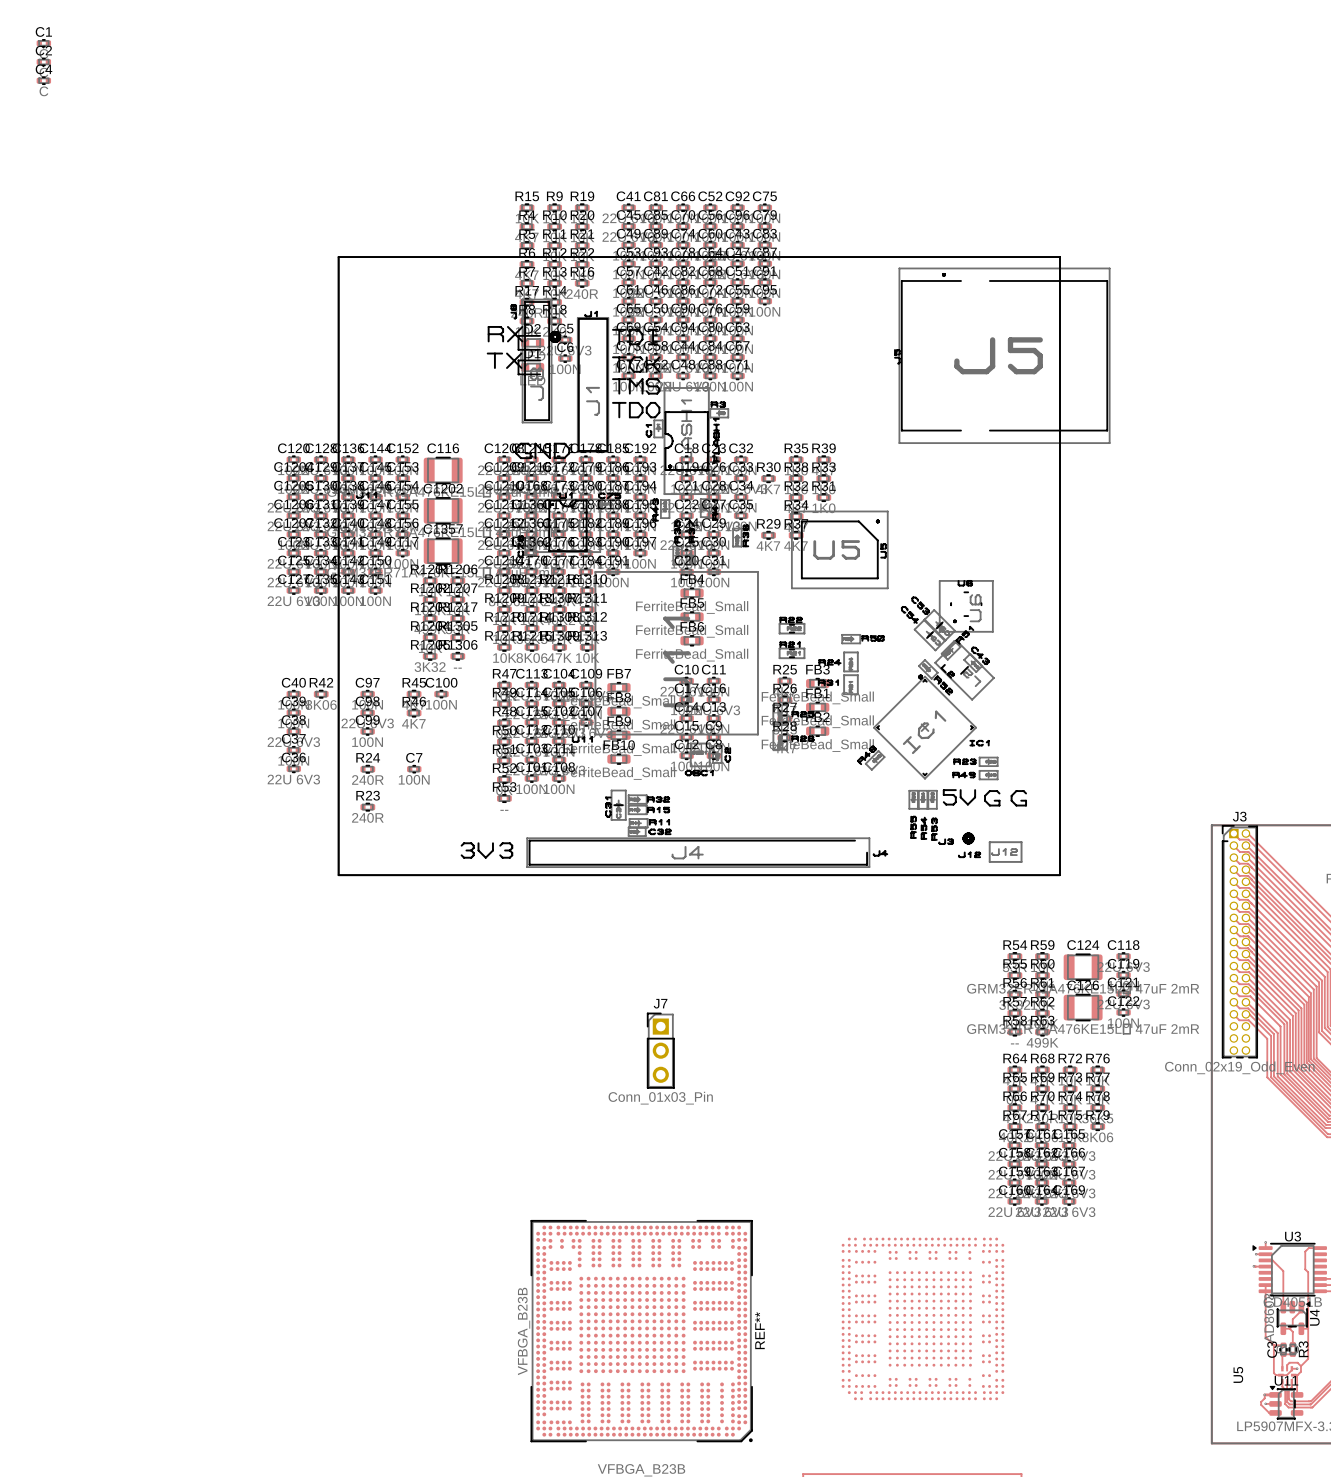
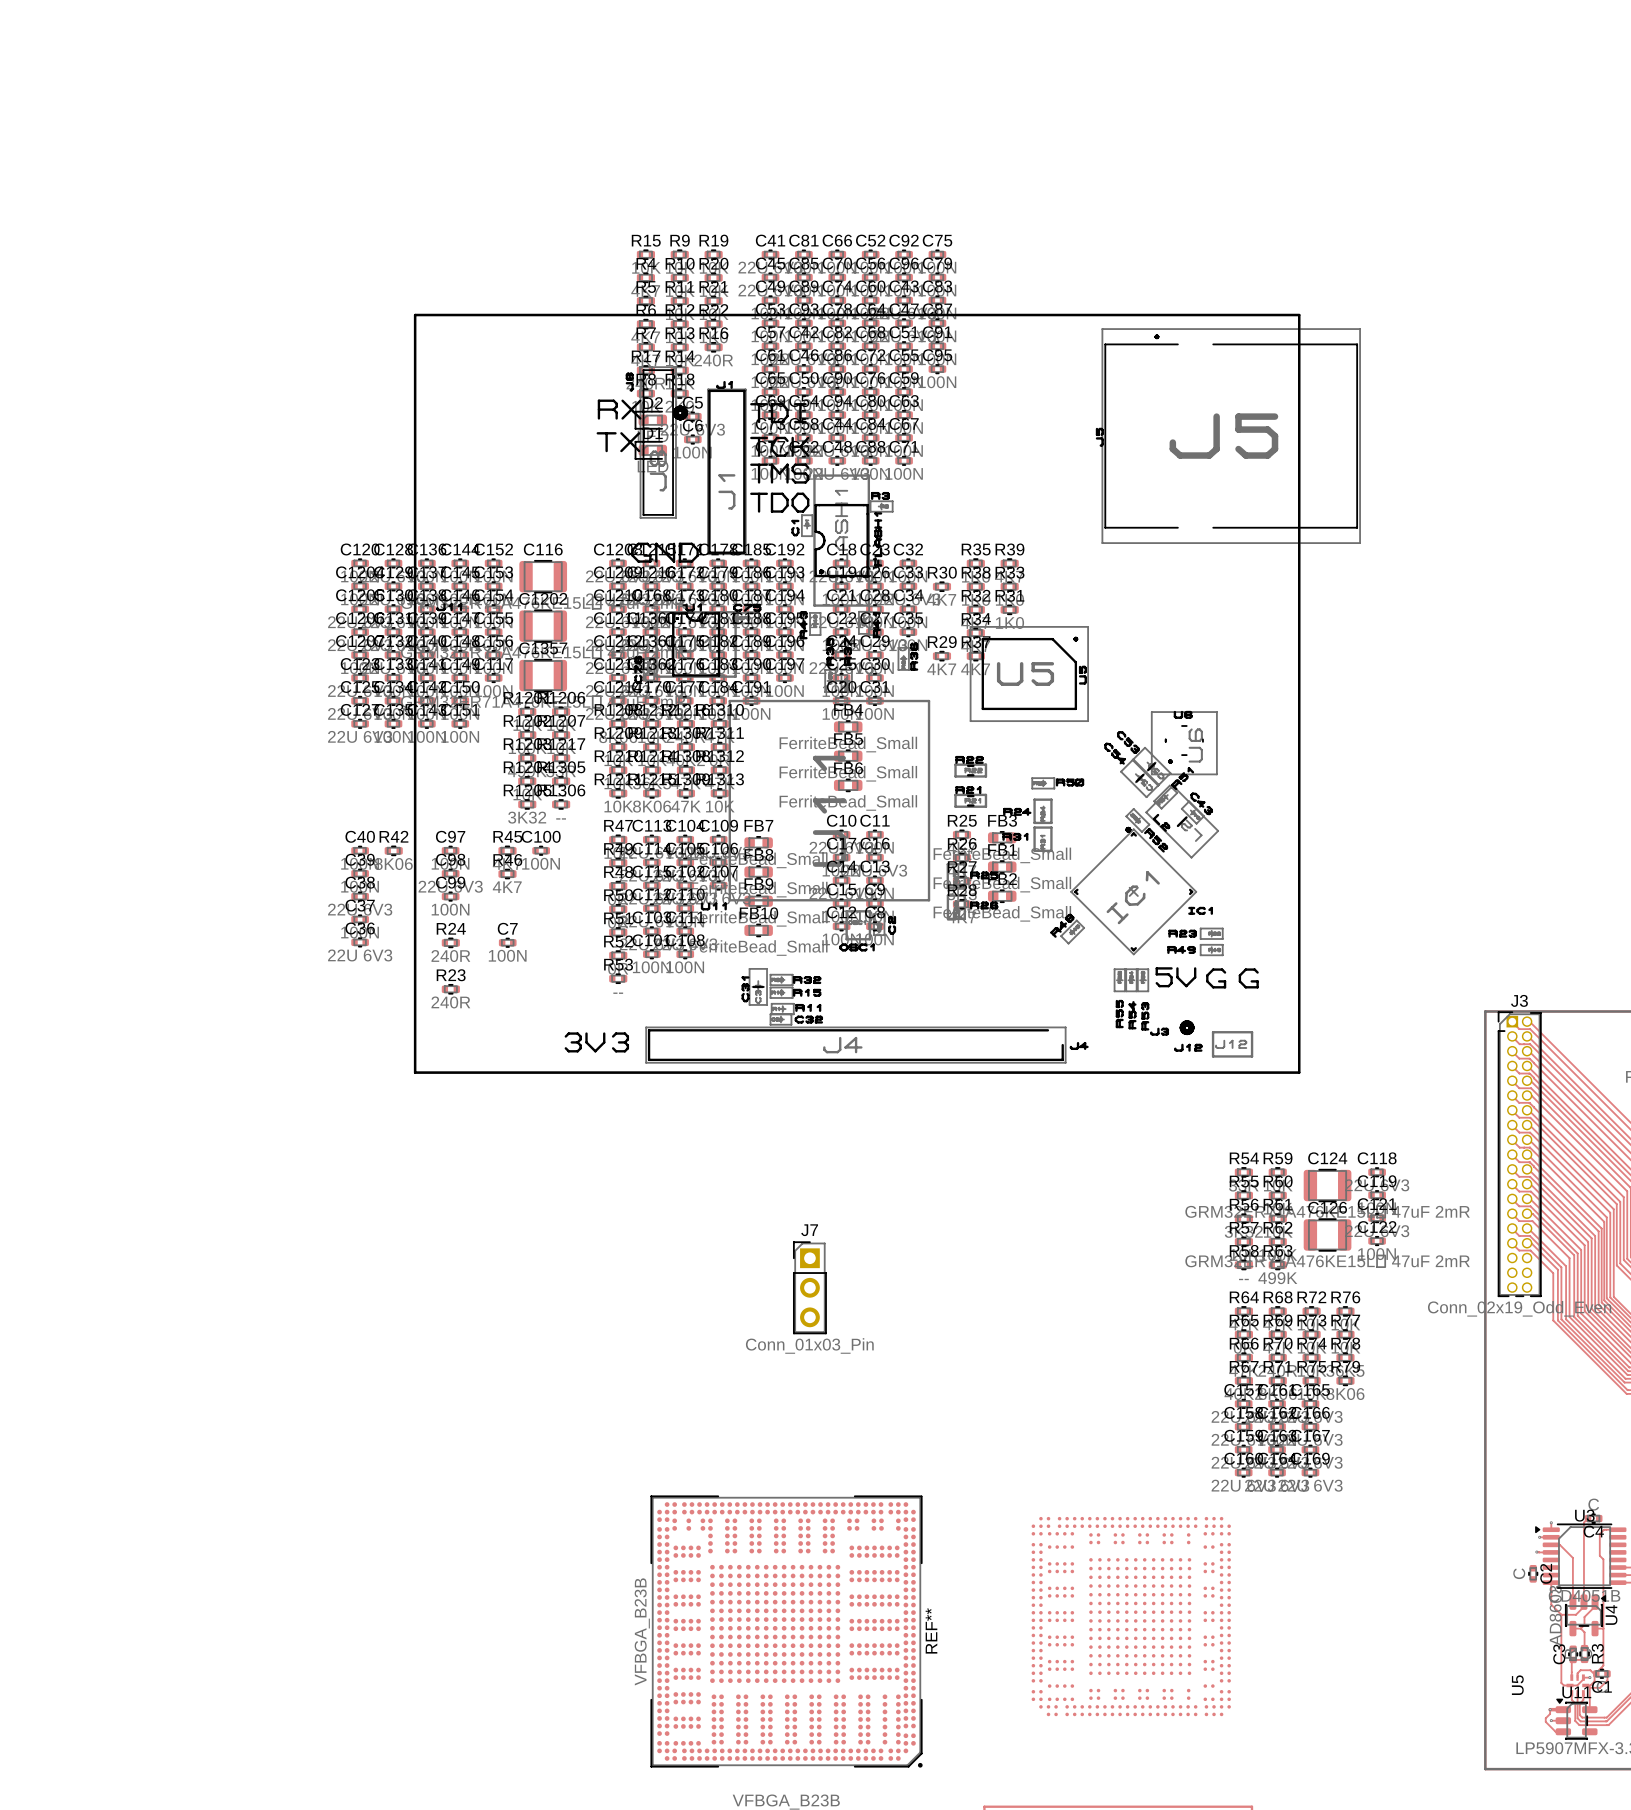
C1 name position: C1 (43, 31) -> C1 (1601, 1686)
C1 position: (43, 43) -> (1601, 1673)
C2 rotation: 0° (43, 62) -> 90° clockwise (1533, 1573)
C2 position: (43, 62) -> (1533, 1573)
C4 name position: C4 (43, 69) -> C4 (1593, 1531)
C4 position: (43, 80) -> (1593, 1518)
C4 value position: C (43, 91) -> C (1593, 1504)
track: none -> (1588, 1518) (1583, 1522) (1583, 1606) (1575, 1614) (1561, 1614)
track: (1265, 1309) (1265, 1336) (1273, 1345) (1283, 1345) -> (1551, 1604) (1561, 1614)
track: none -> (1561, 1614) (1561, 1648)
track: none -> (1602, 1668) (1607, 1673) (1607, 1680) (1600, 1687) (1589, 1687)

